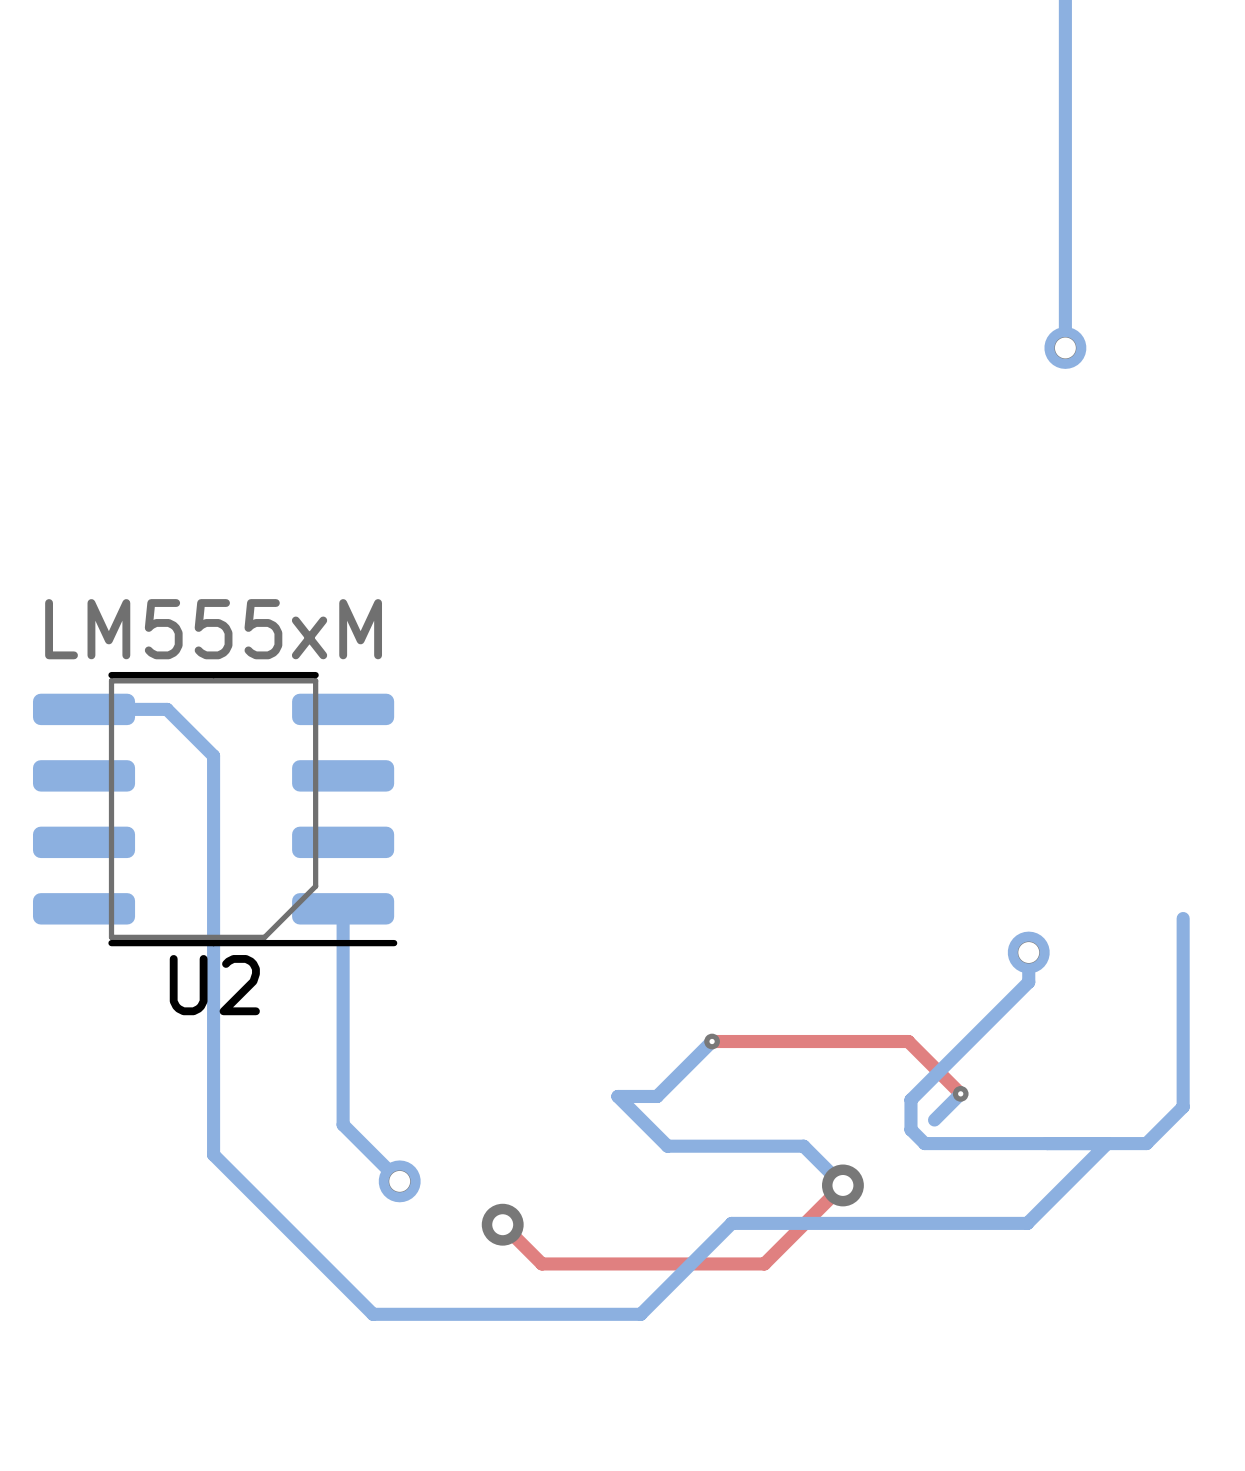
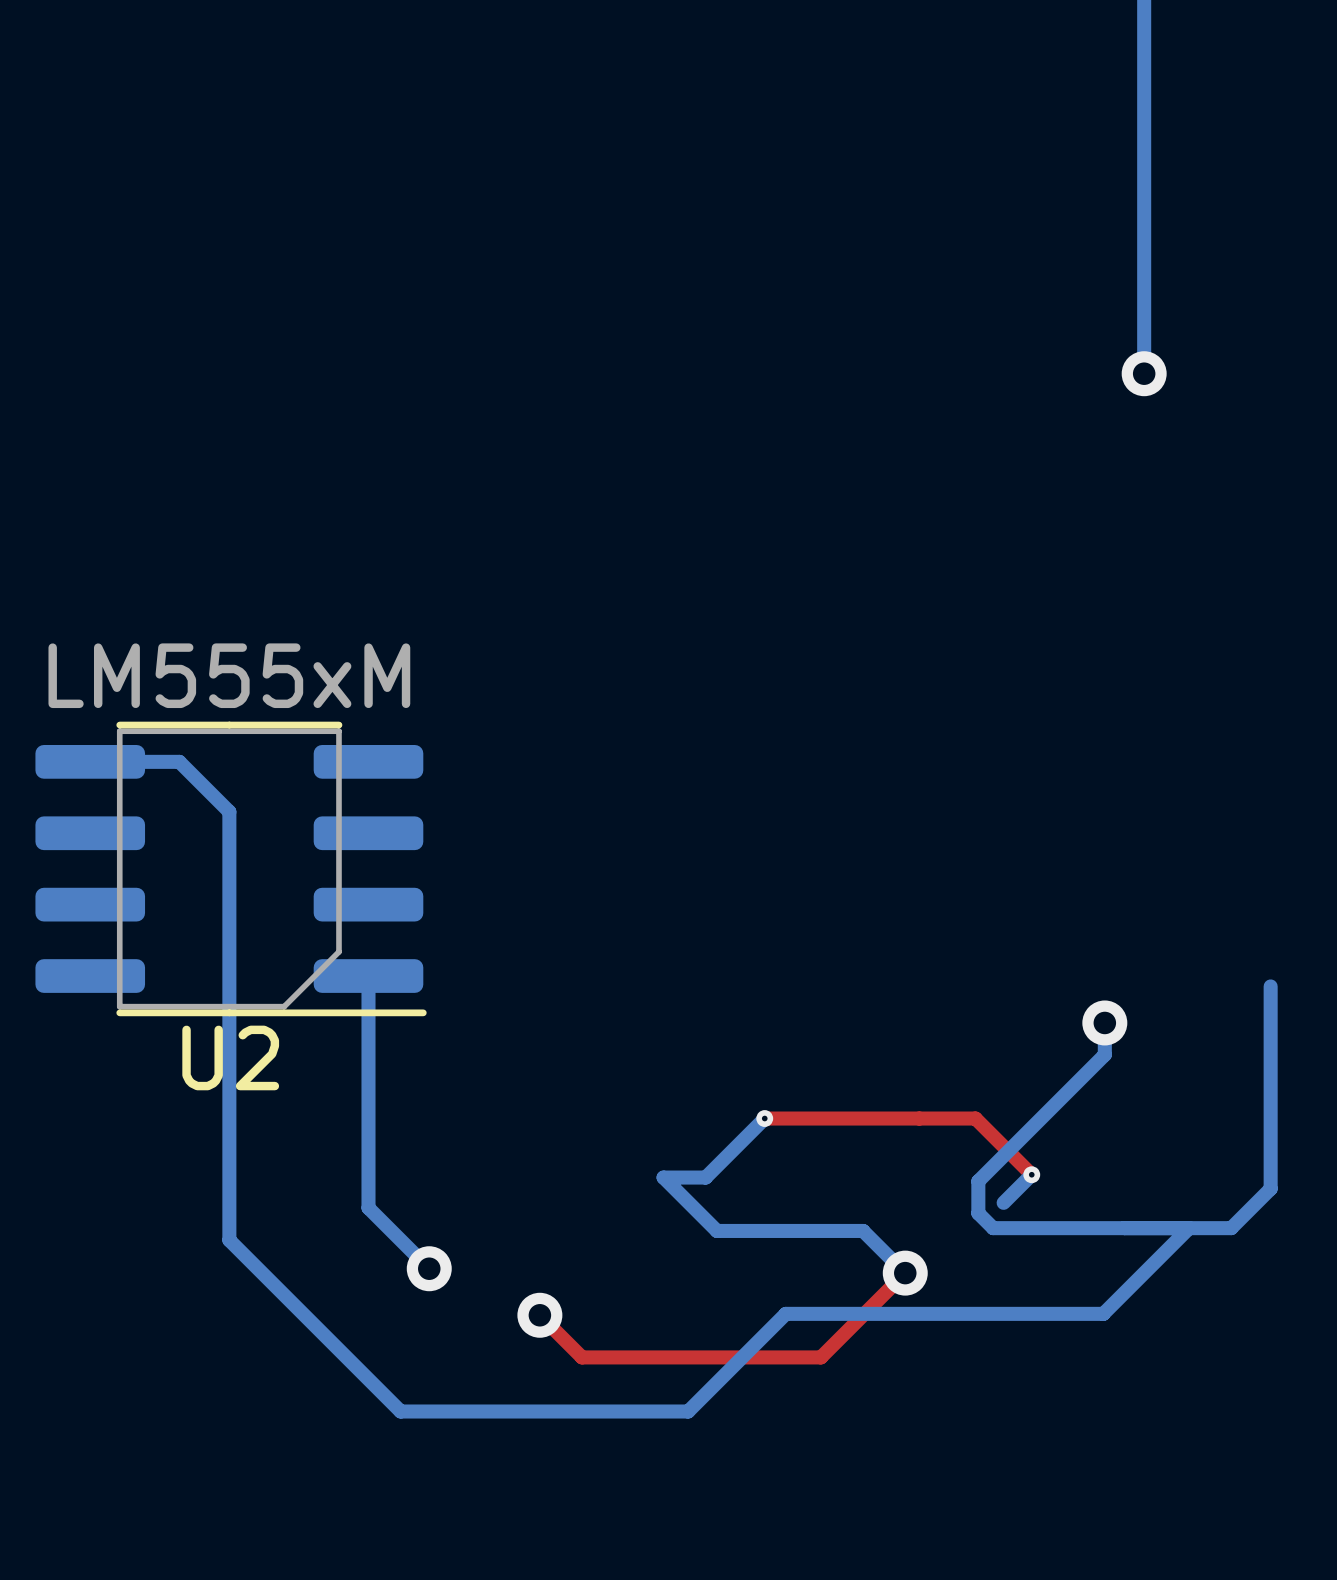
via size: [1054, 336, 1077, 359] -> [1121, 351, 1167, 397]
via size: [1017, 941, 1040, 964] -> [1082, 1000, 1128, 1046]
via size: [388, 1170, 411, 1193] -> [406, 1246, 452, 1292]

